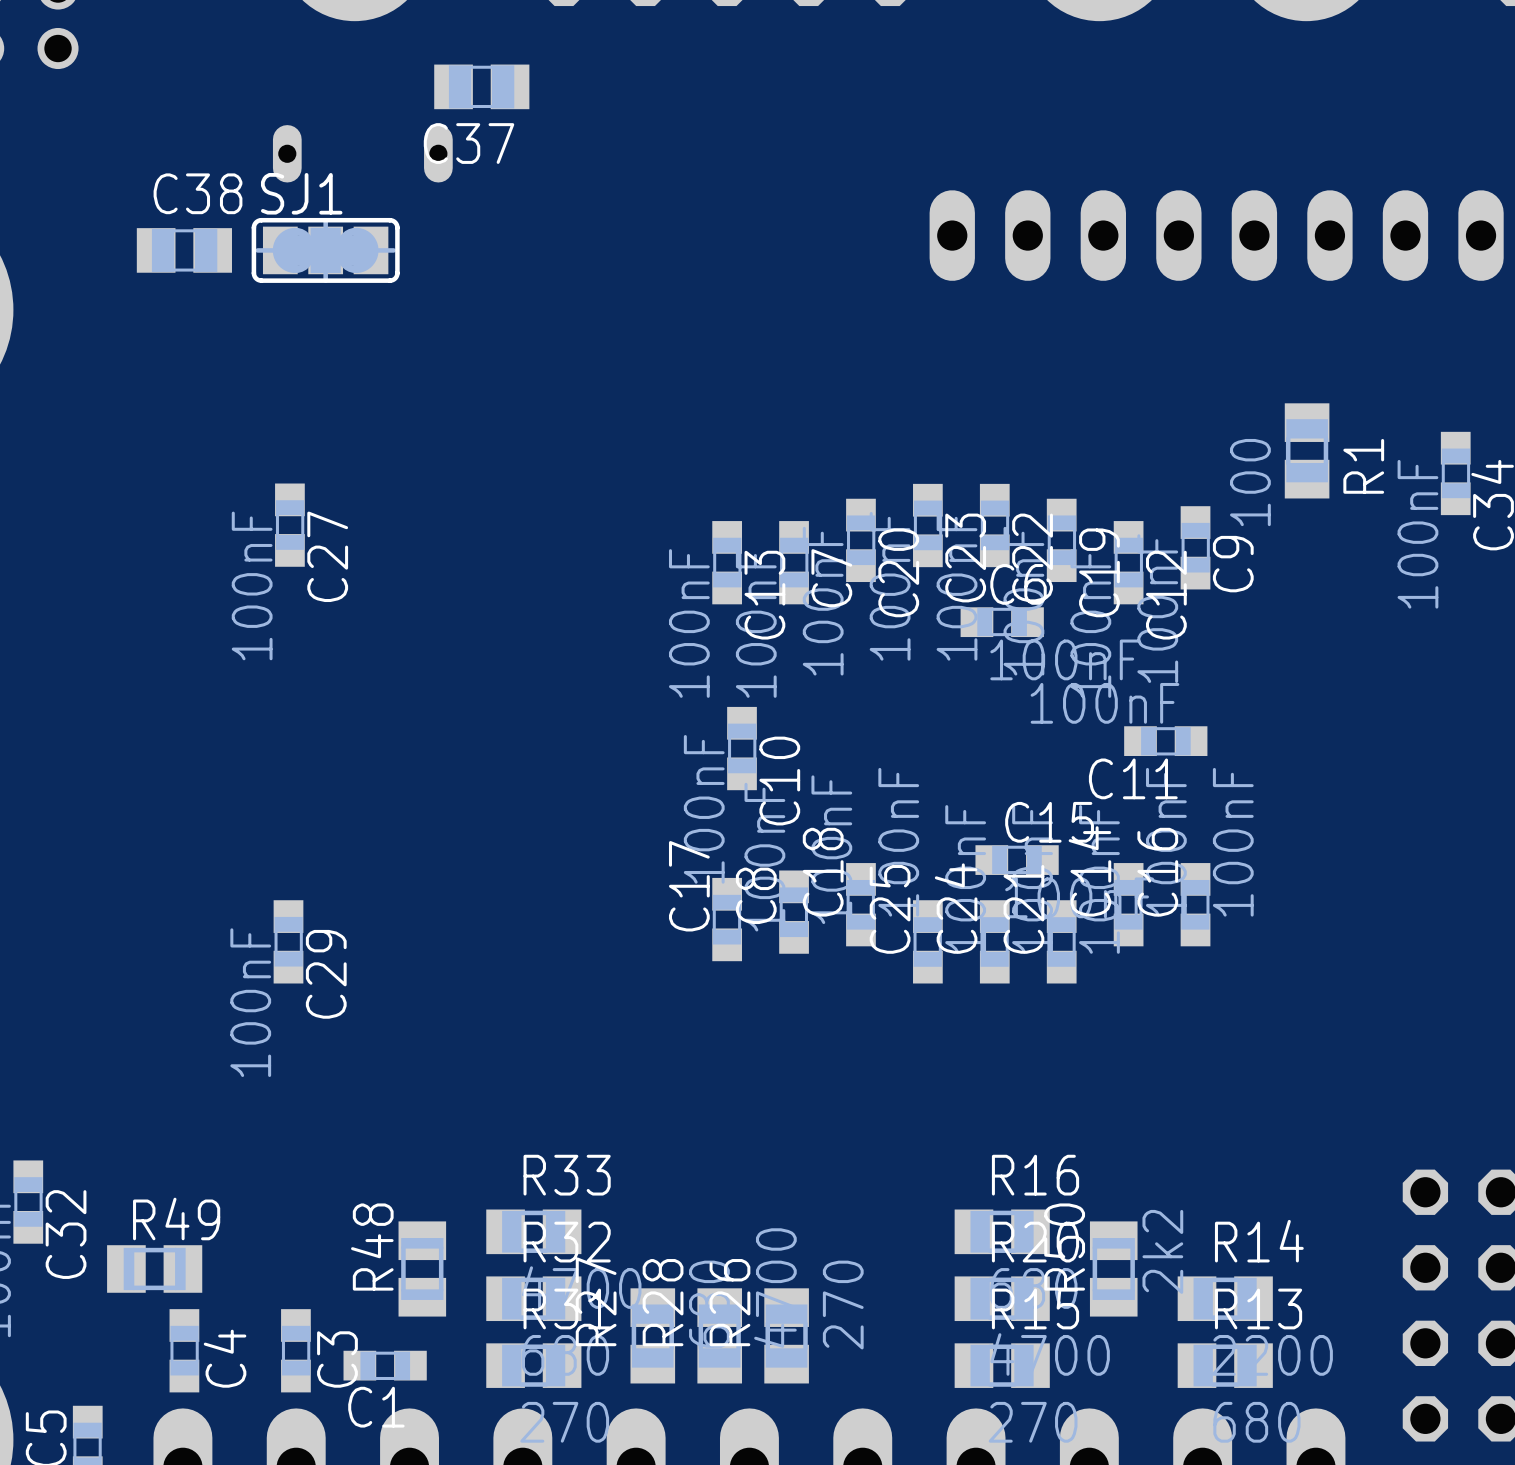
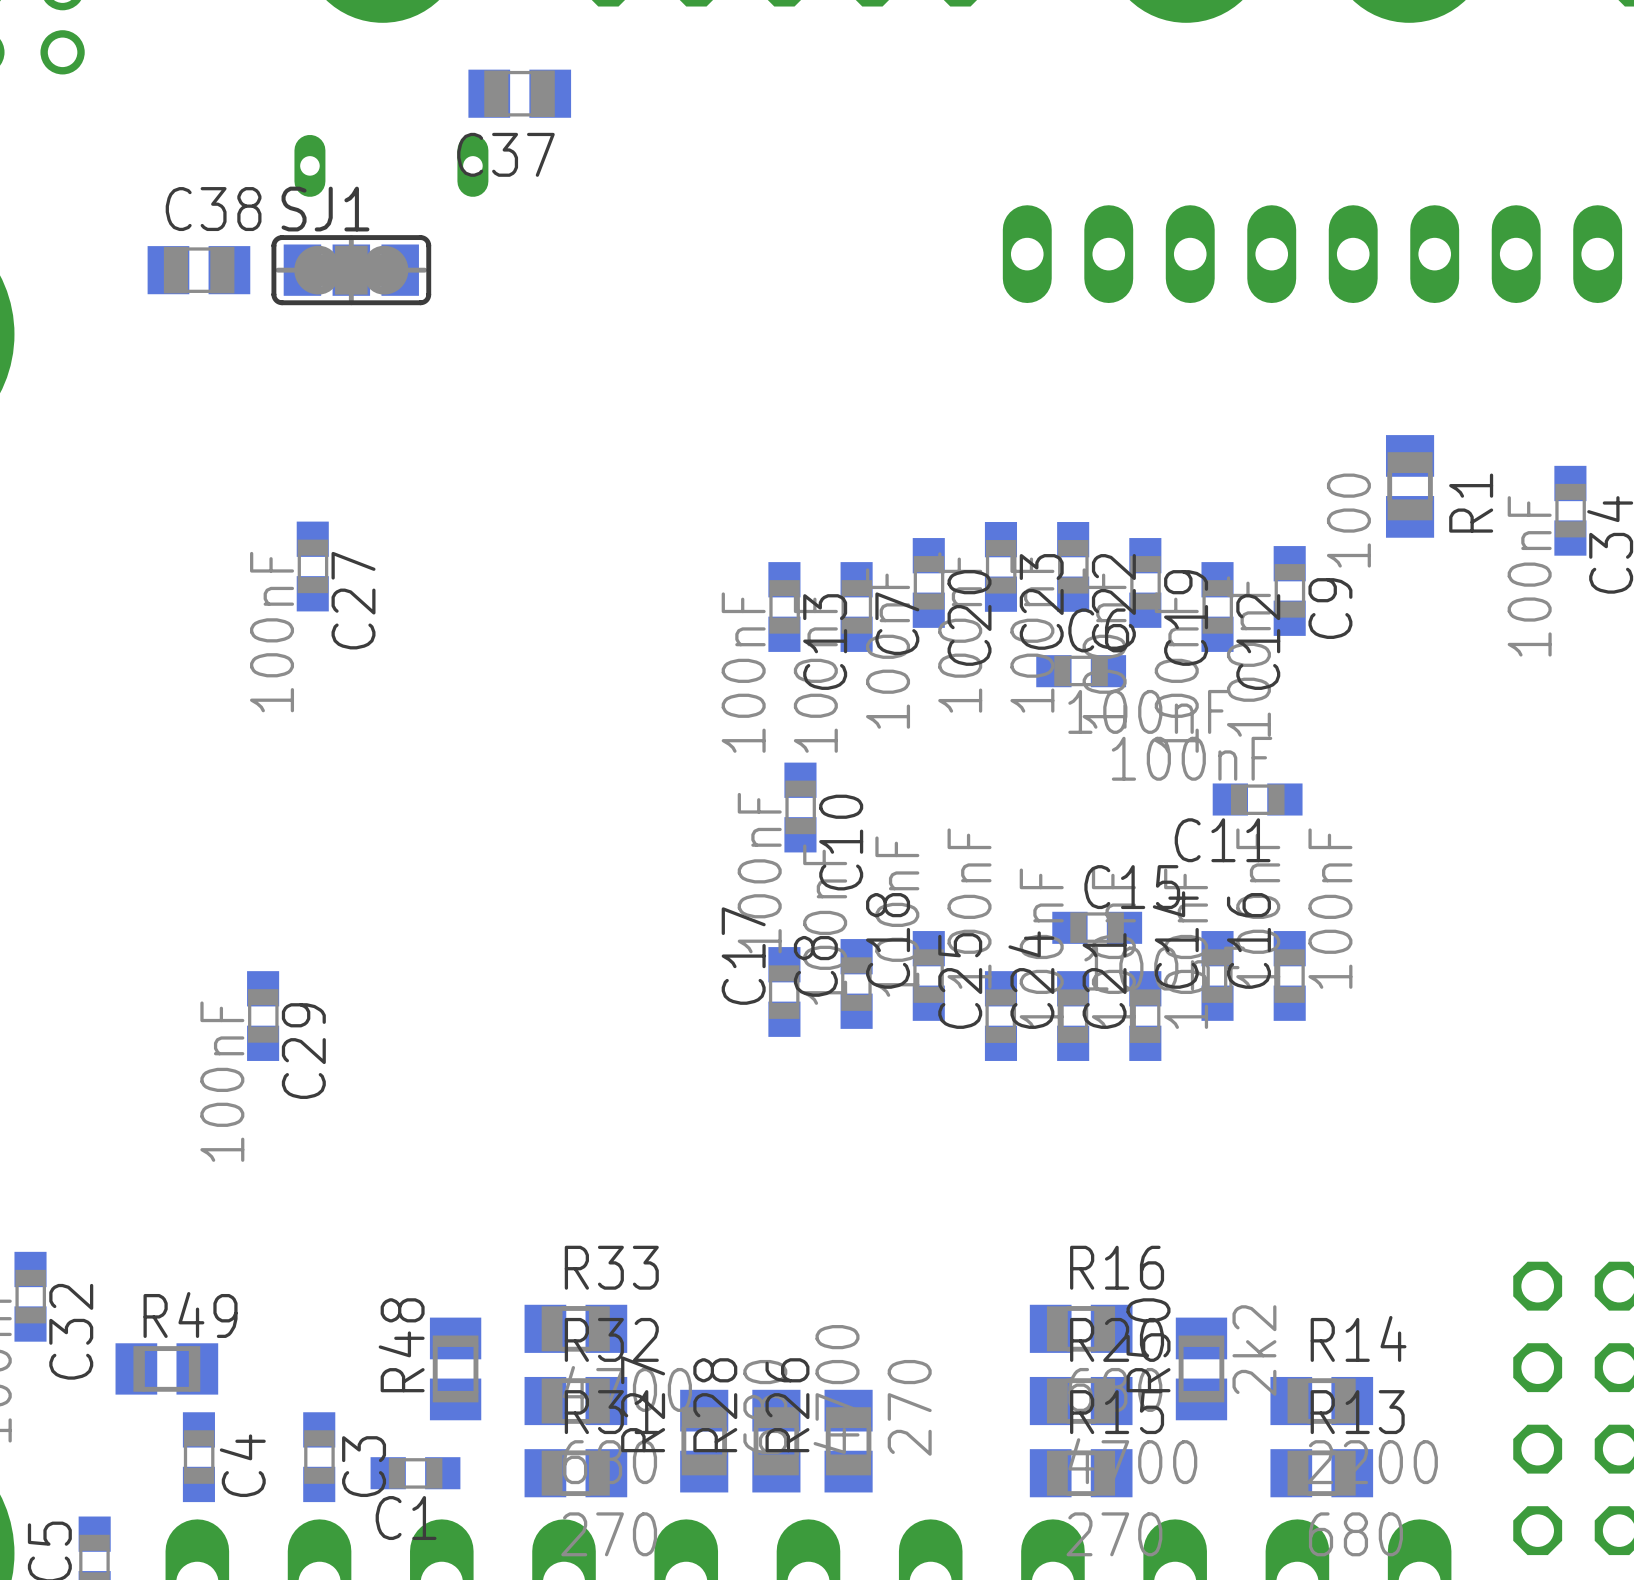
C29 position: (288, 941) -> (263, 1016)

